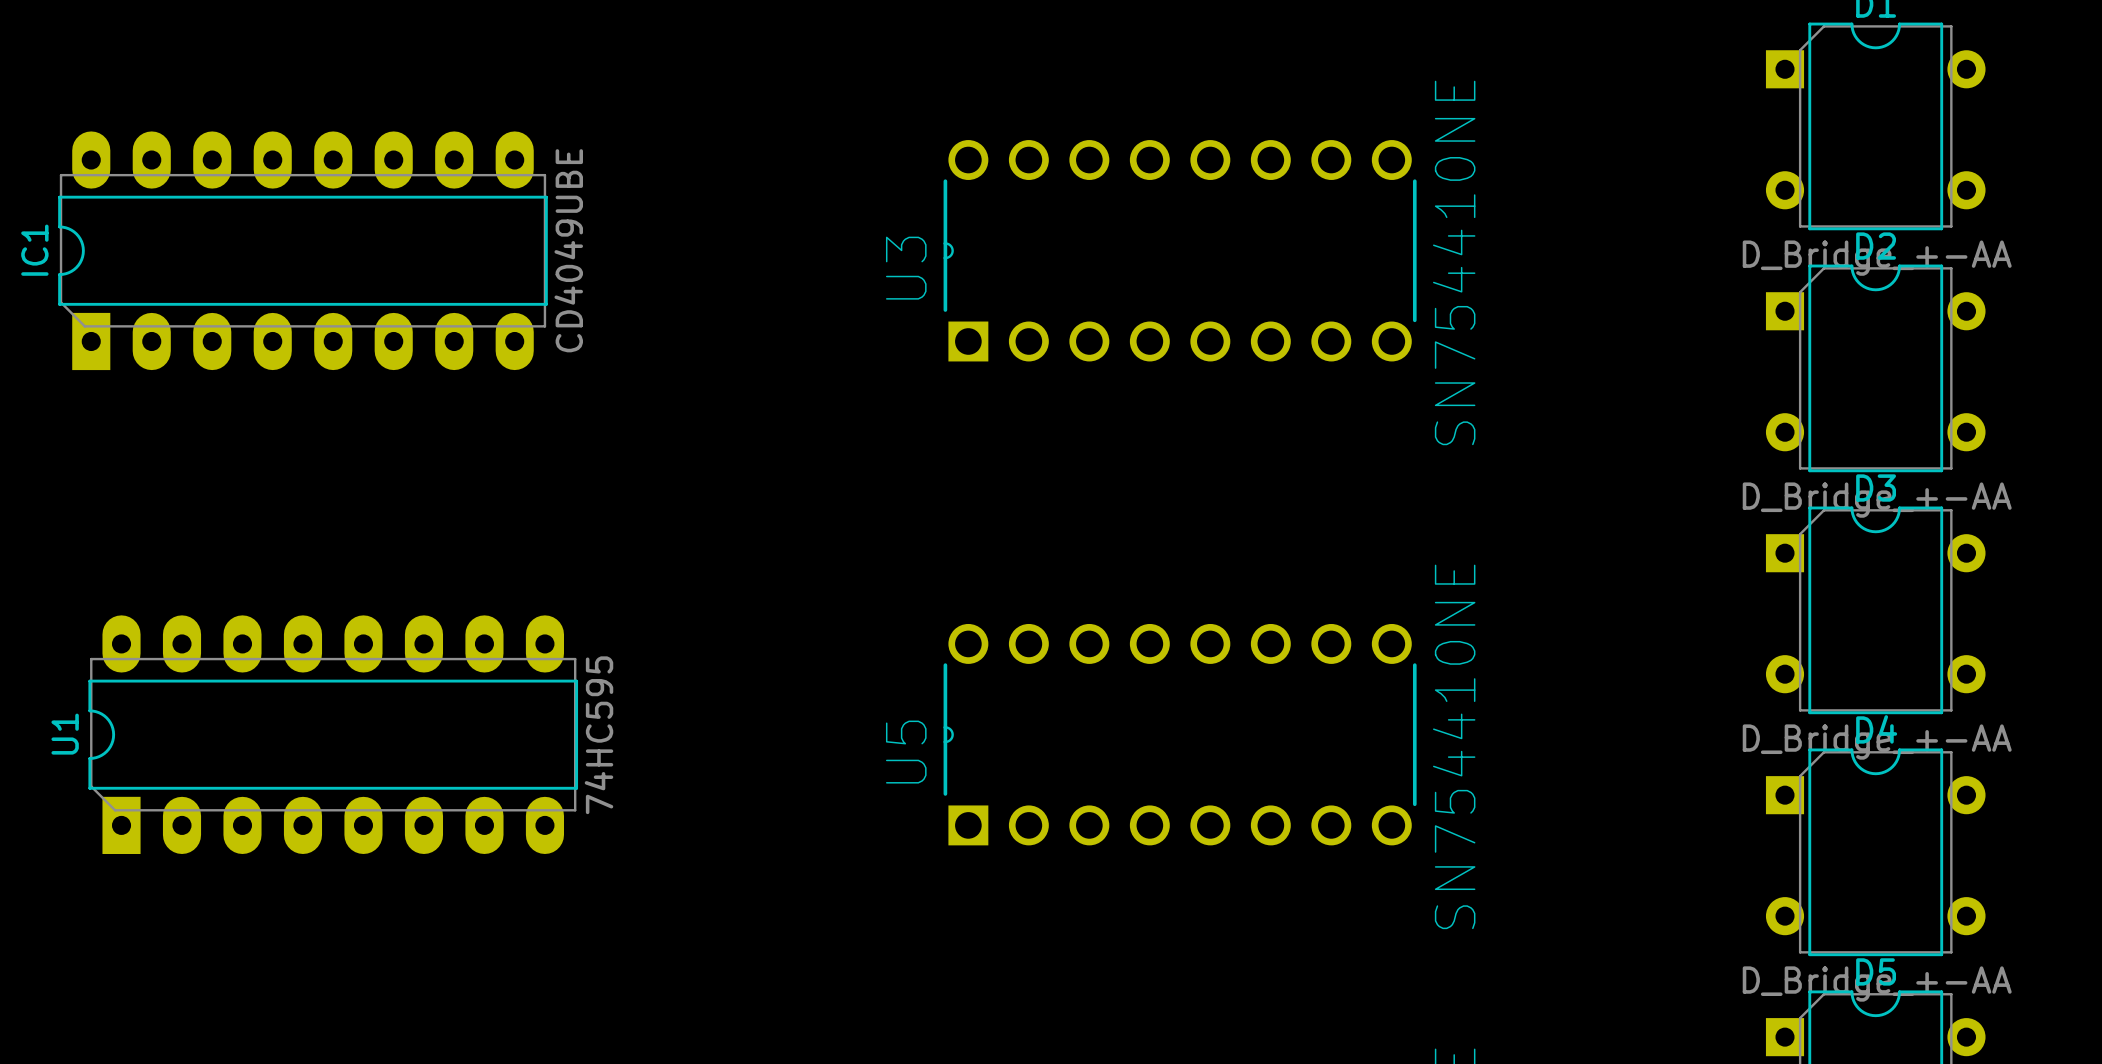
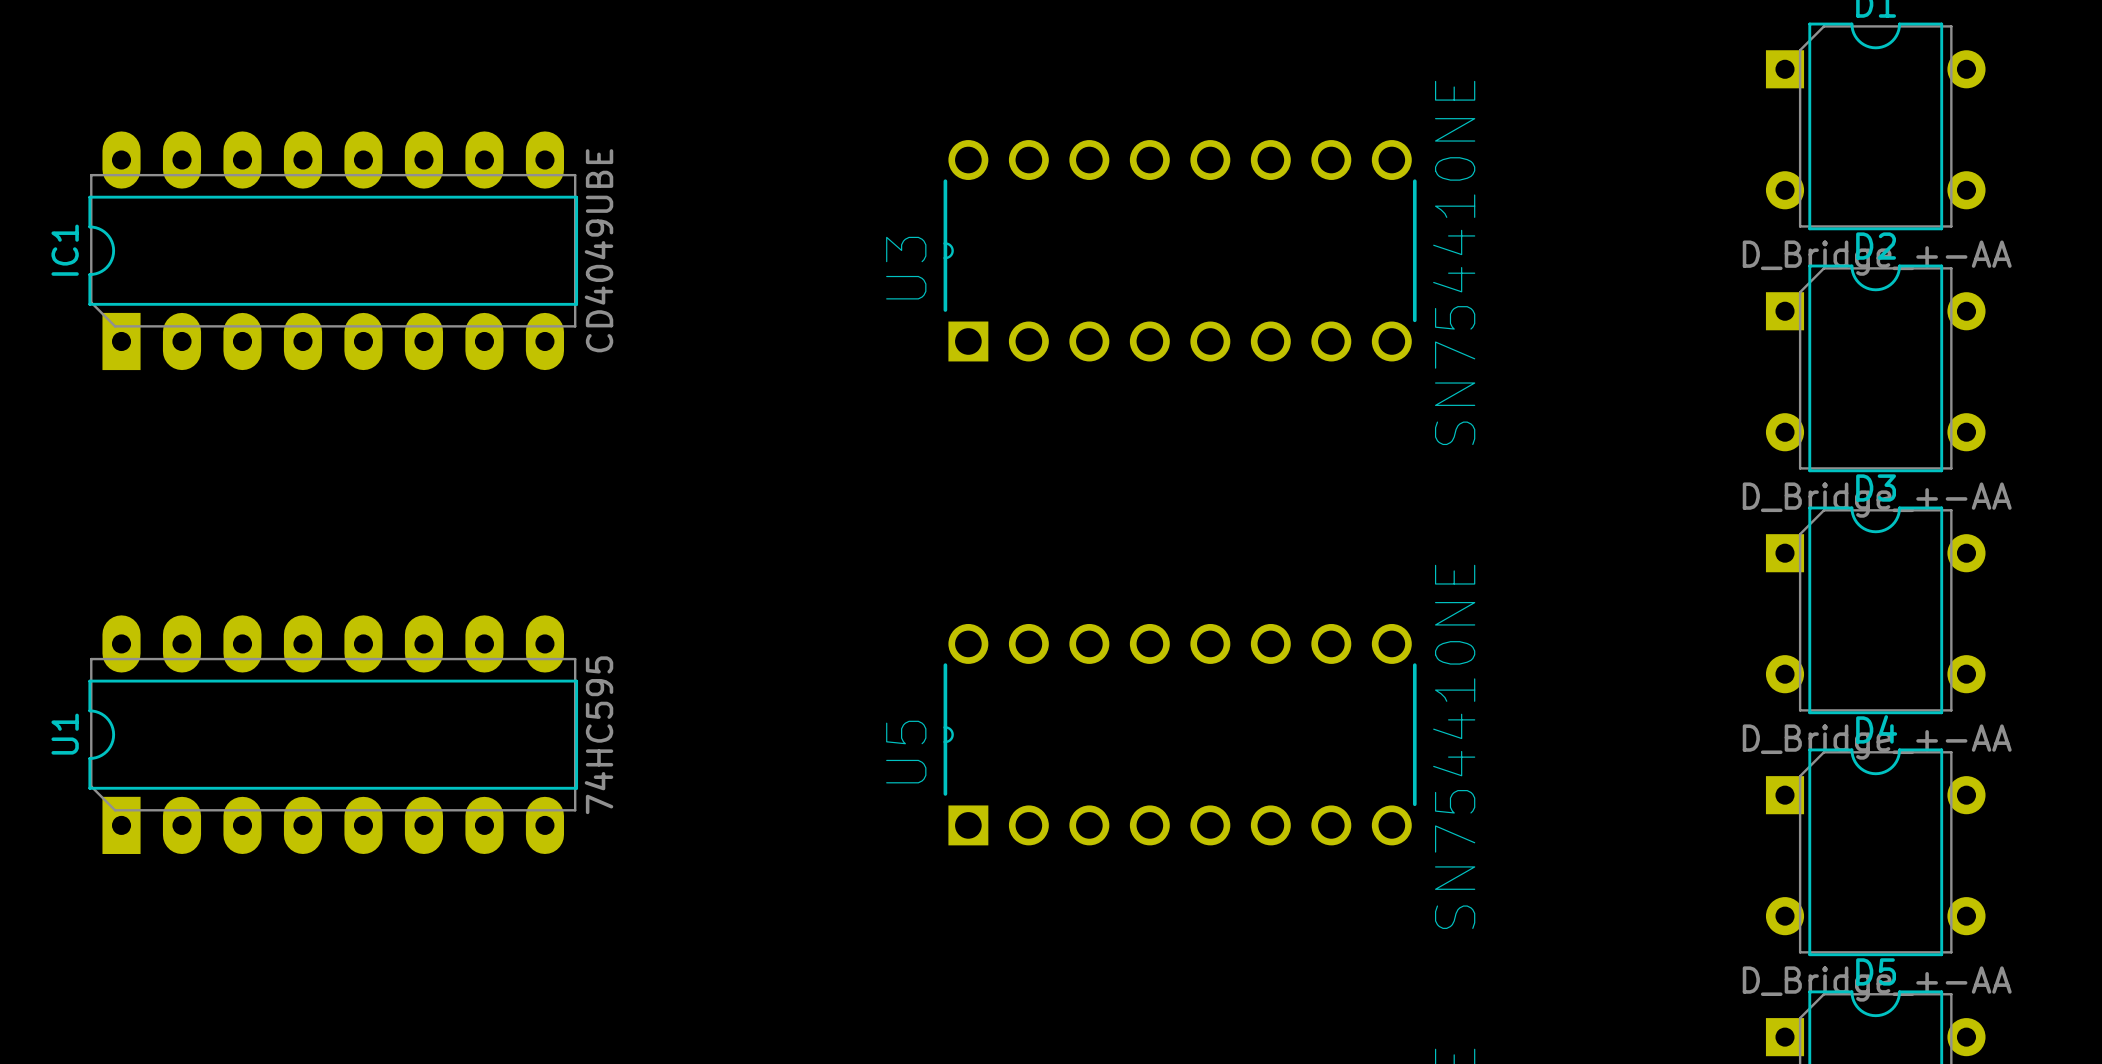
IC1 position: (302, 250) -> (333, 250)

